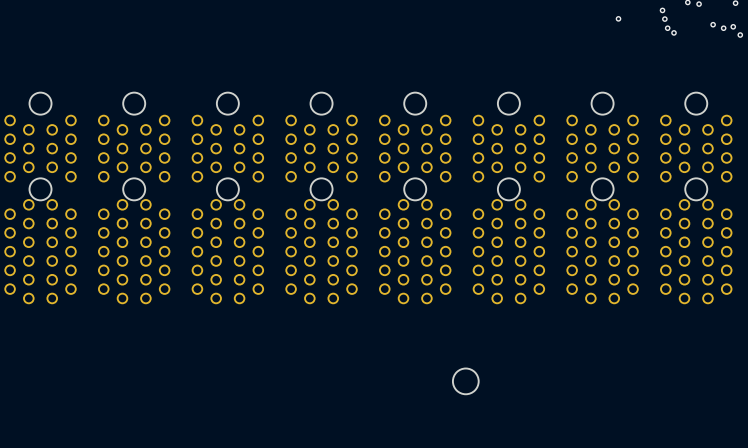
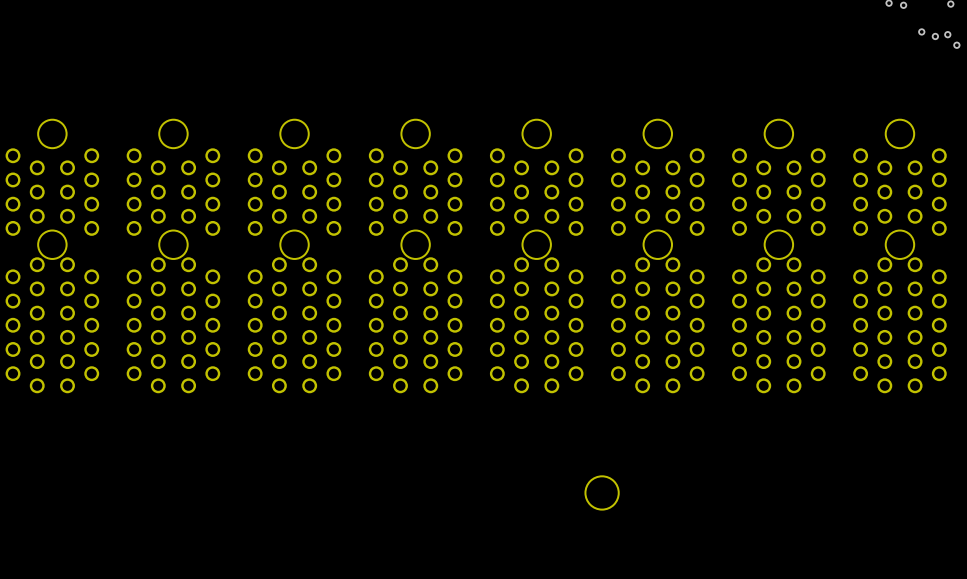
via: (662, 10) -> none
via: (618, 18) -> none
via: (664, 19) -> none
via: (667, 28) -> none
via: (674, 32) -> none

